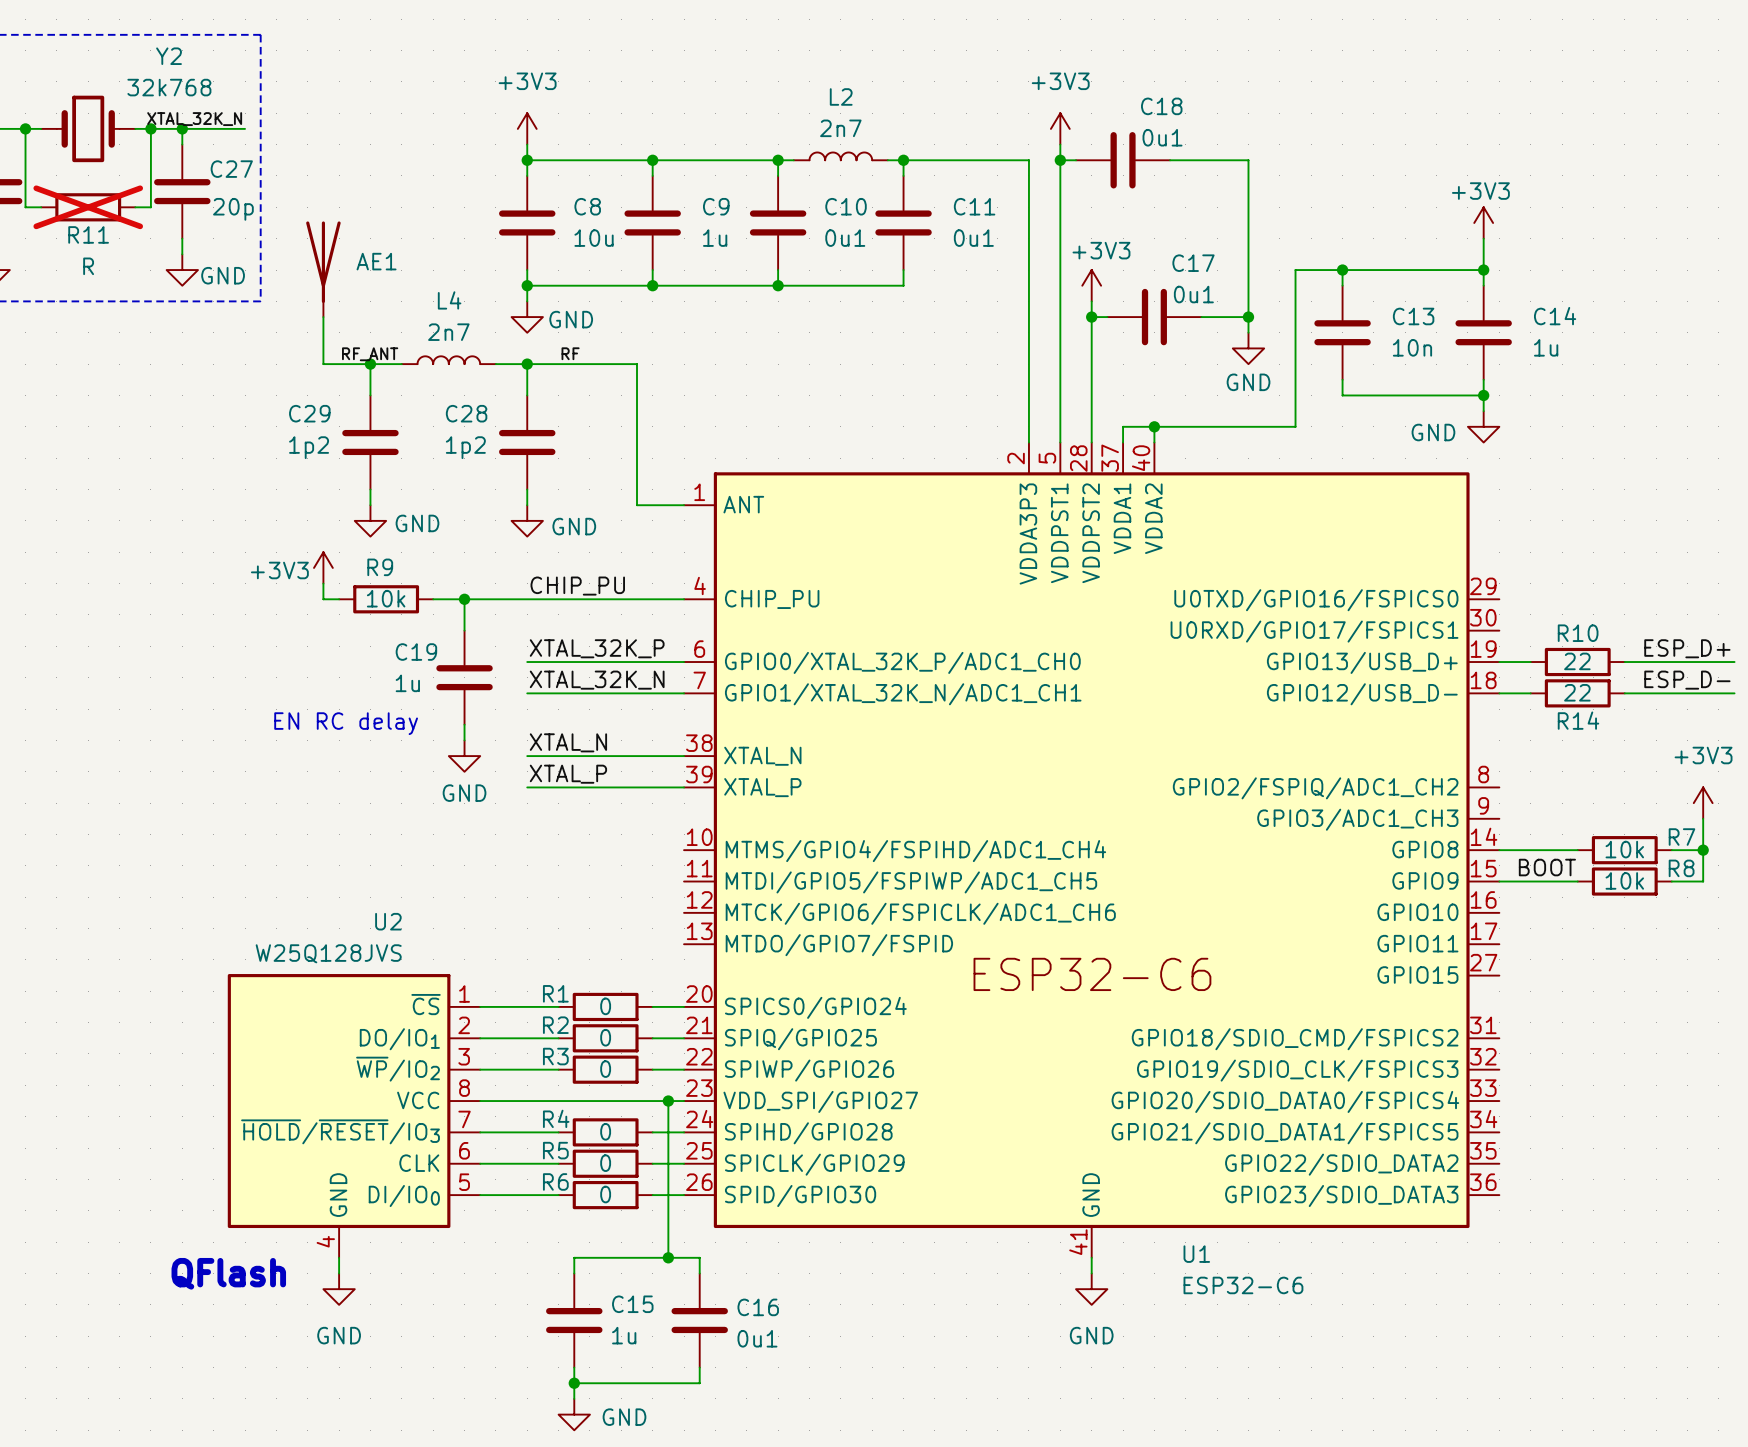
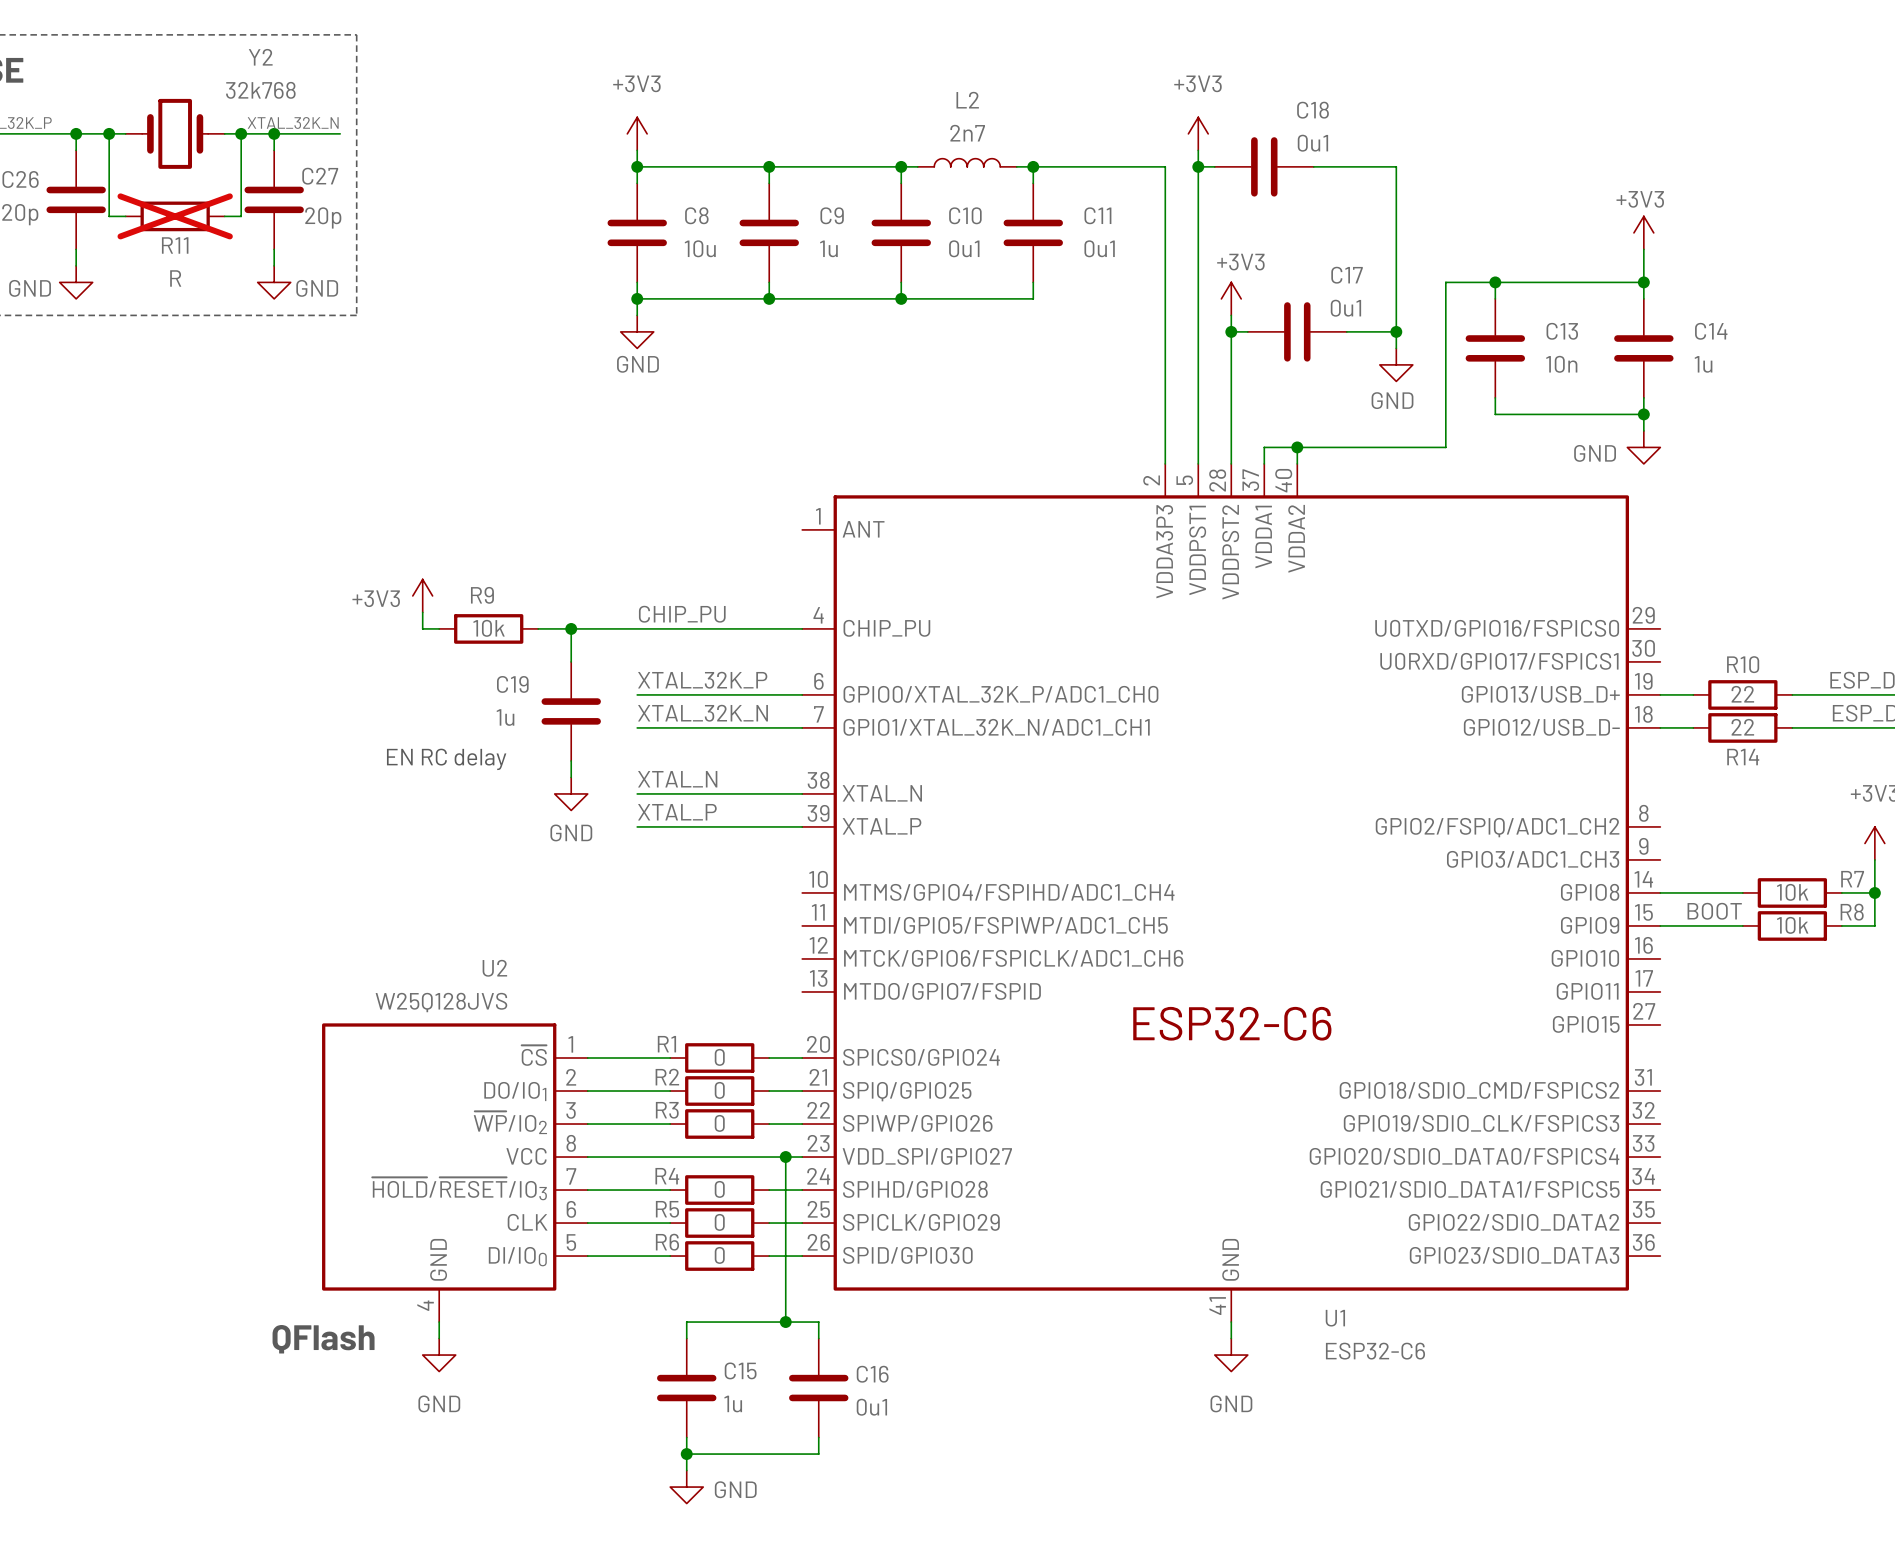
AE1: (323, 269) -> none
wire: (323, 317) (323, 364) (401, 364) -> none
power symbol text position: GND (571, 319) -> GND (637, 364)
label: RF (570, 353) -> none
label: RF_ANT (370, 354) -> none
L4: 2n7 (448, 360) -> none
wire: (370, 364) (370, 395) -> none
junction: (370, 364) -> none
wire: (495, 364) (637, 364) (637, 505) (684, 505) -> none
wire: (527, 364) (527, 395) -> none
junction: (527, 364) -> none
C29: 1p2 (370, 442) -> none
C28: 1p2 (527, 442) -> none
wire: (370, 489) (370, 505) -> none
wire: (527, 489) (527, 505) -> none
power symbol: GND (370, 520) -> none
power symbol: GND (527, 520) -> none

